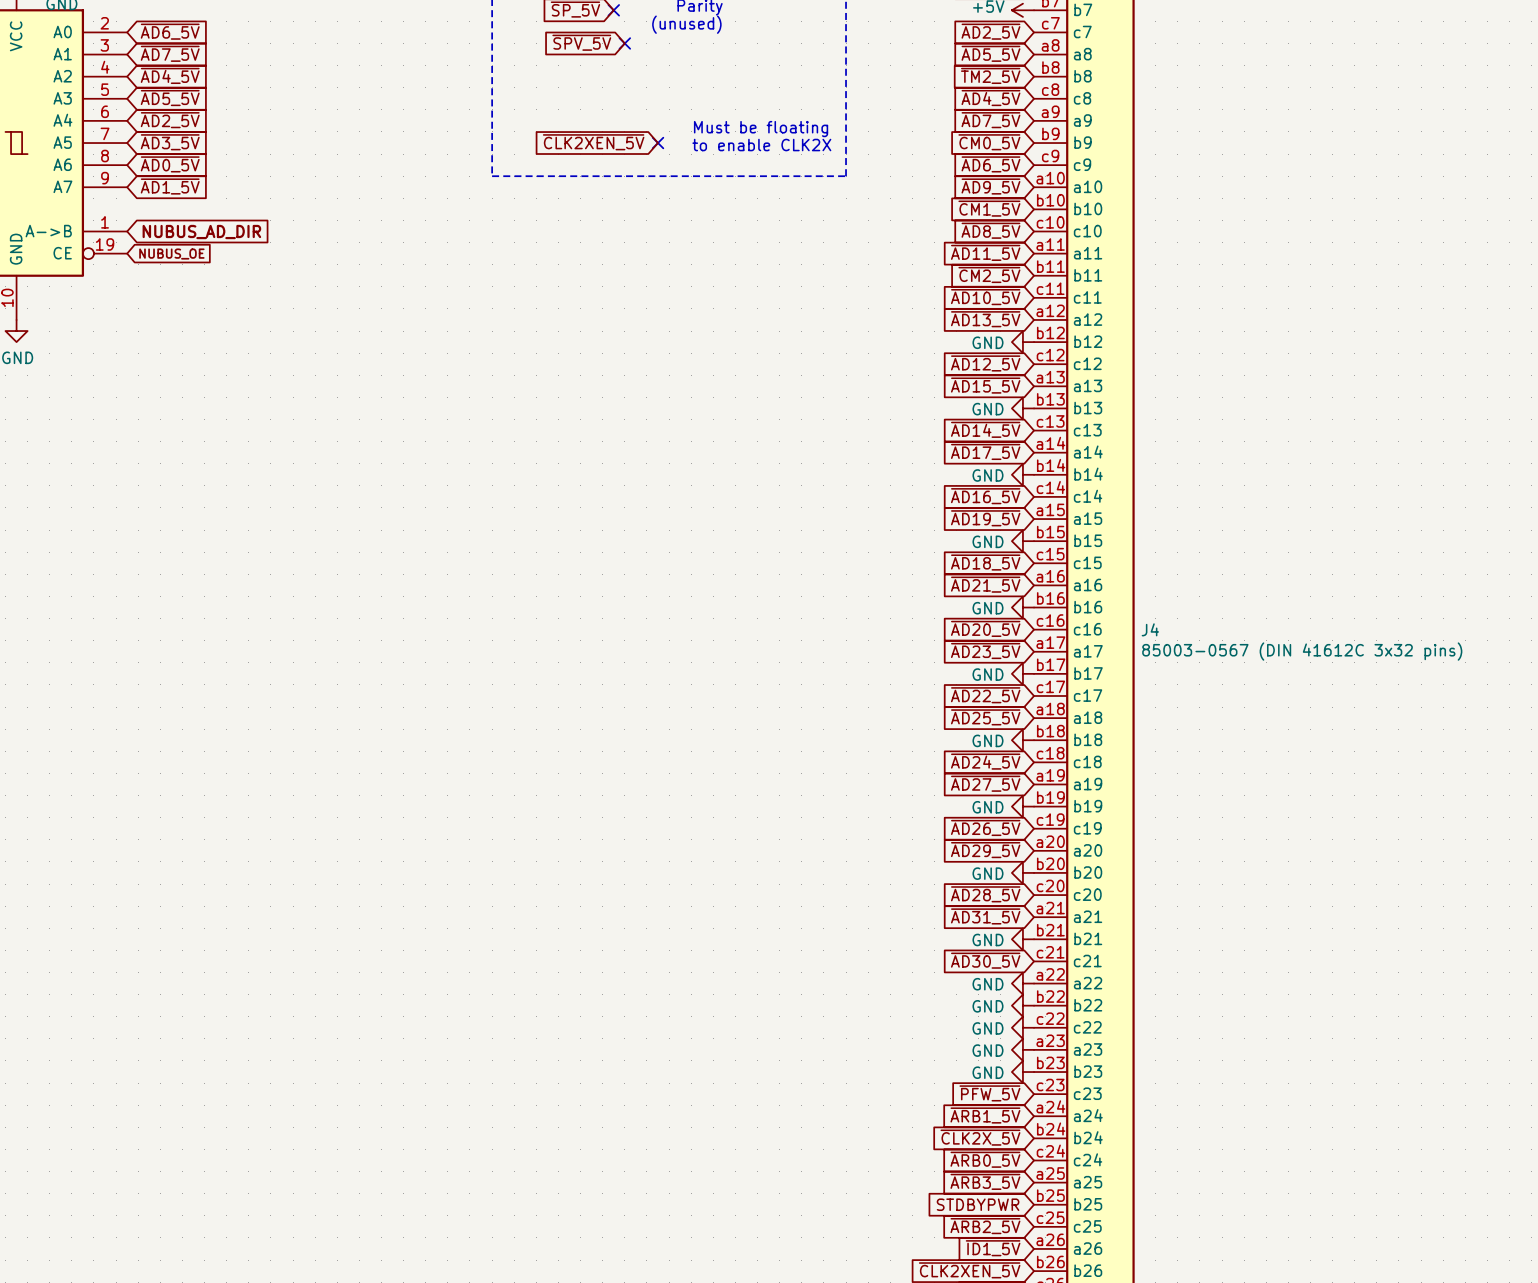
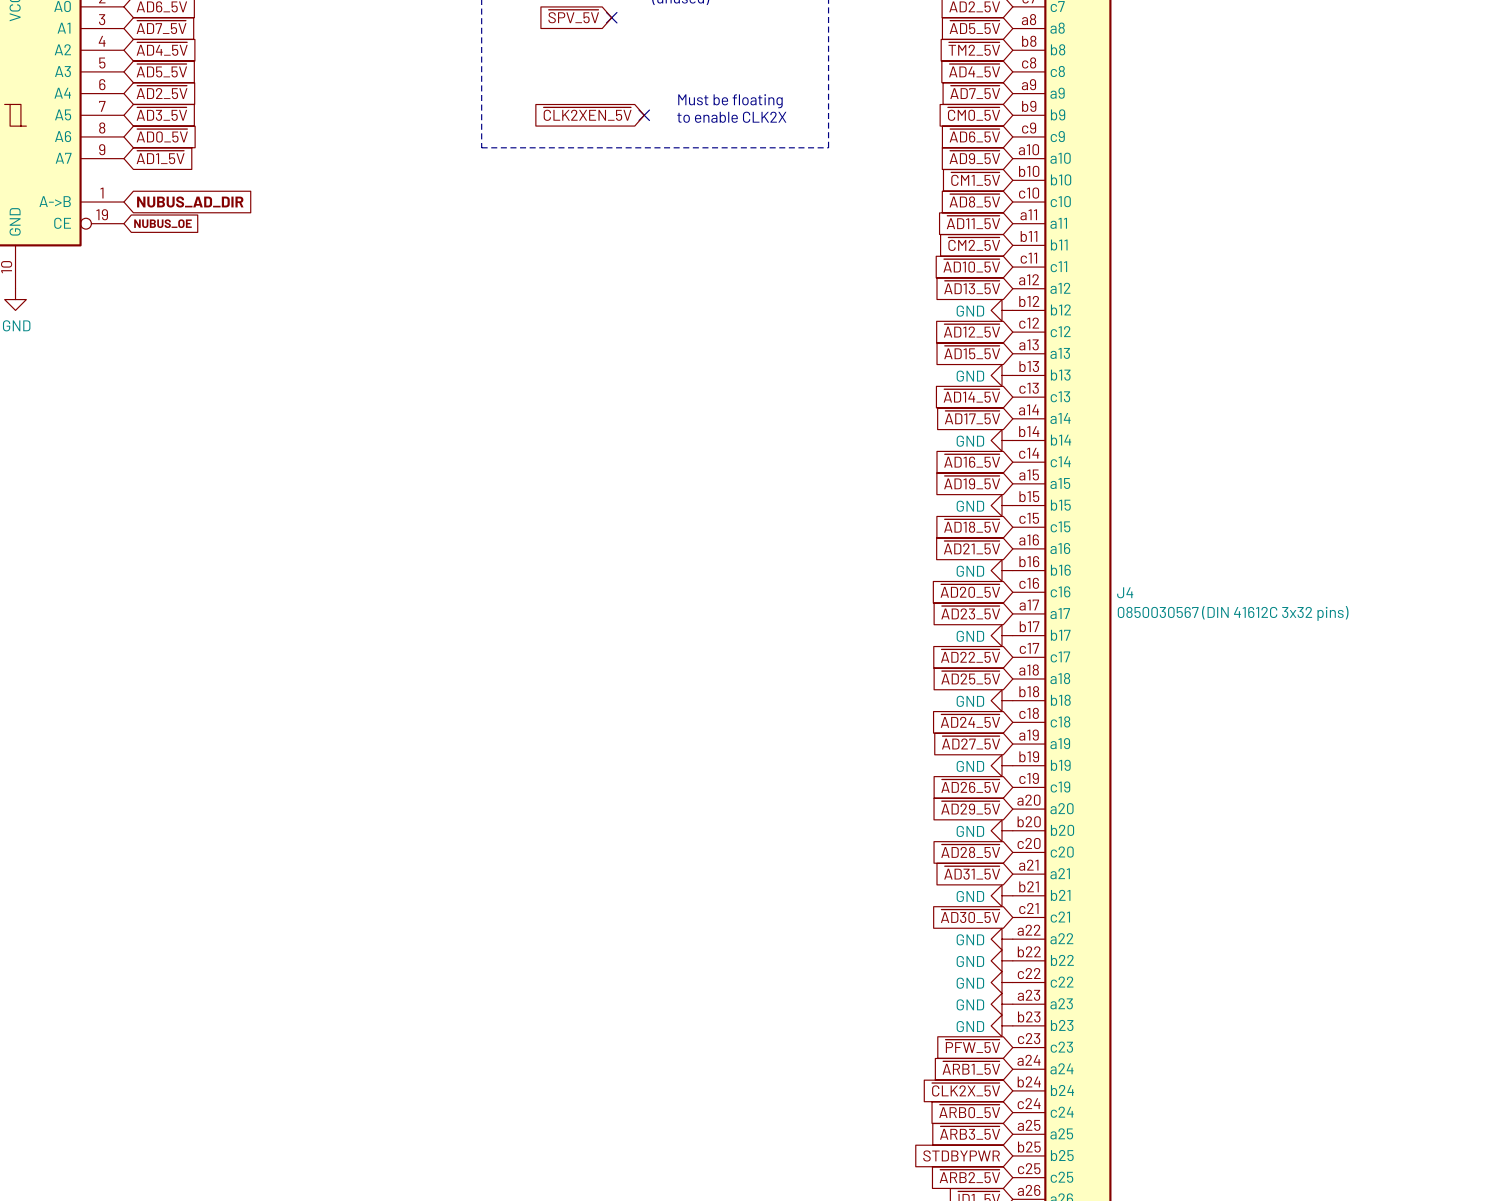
J4 value: 85003-0567 (DIN 41612C 3x32 pins) (1302, 651) -> 0850030567 (DIN 41612C 3x32 pins) (1233, 613)

